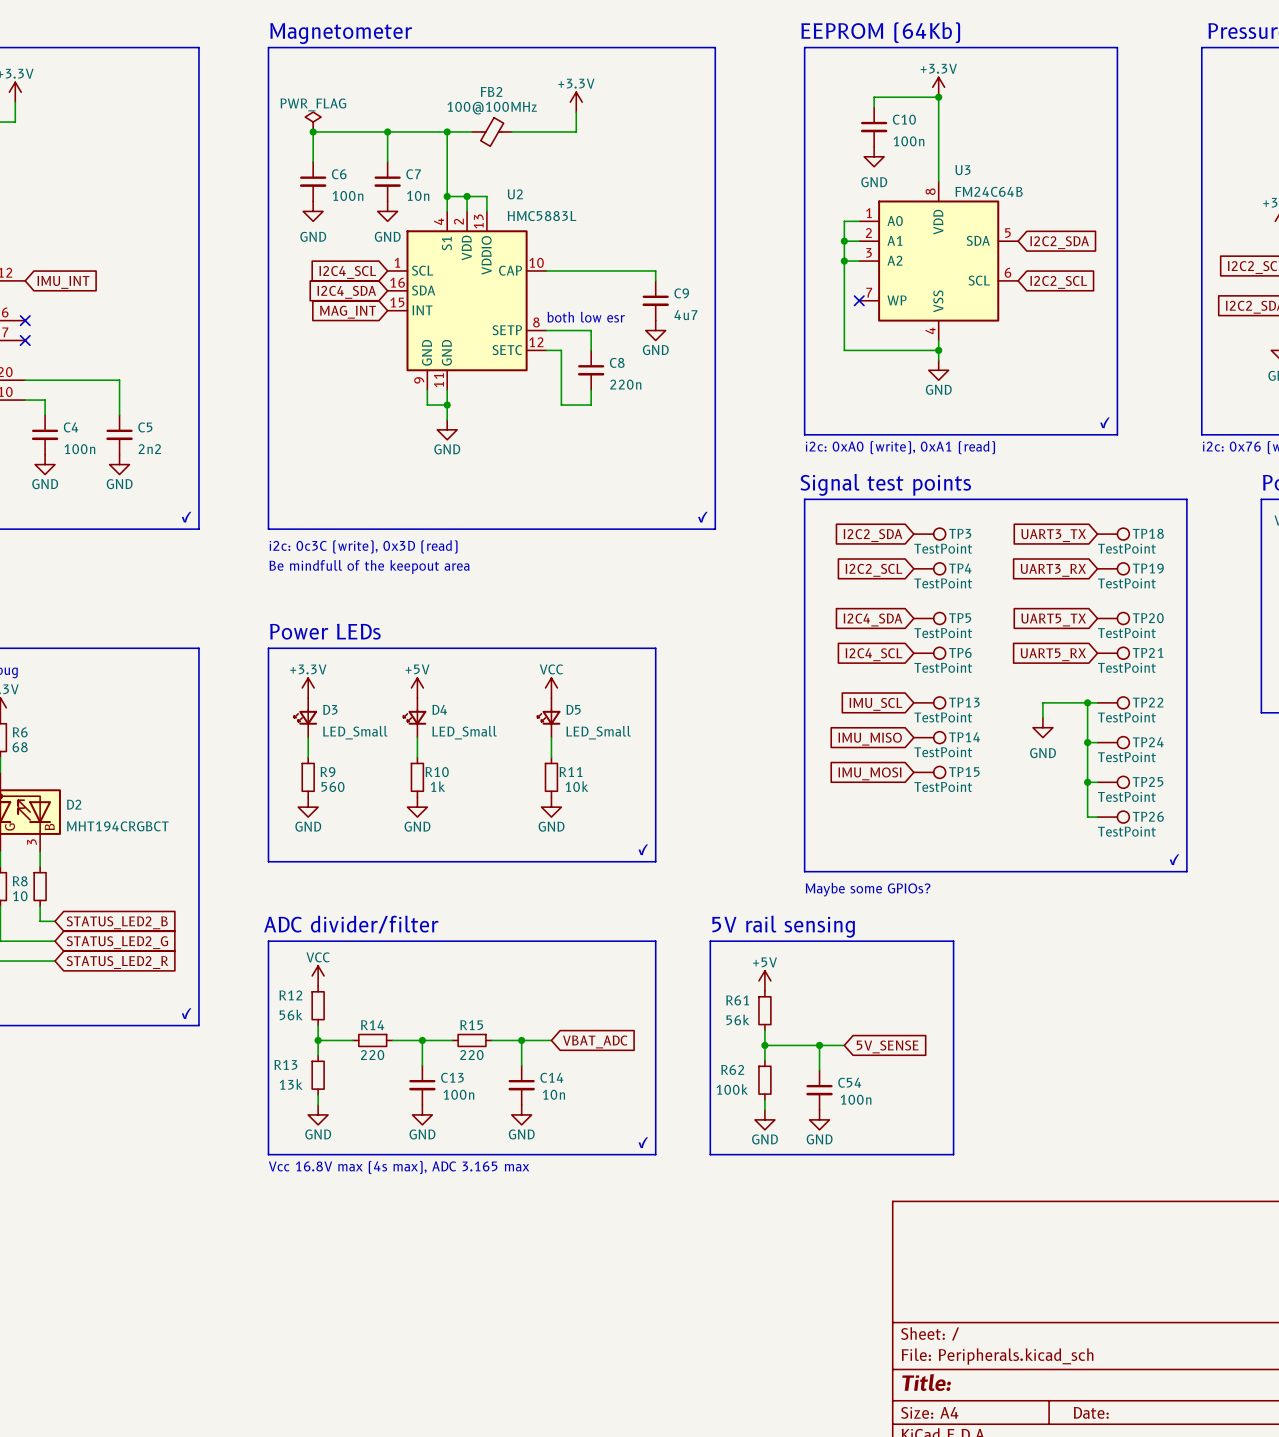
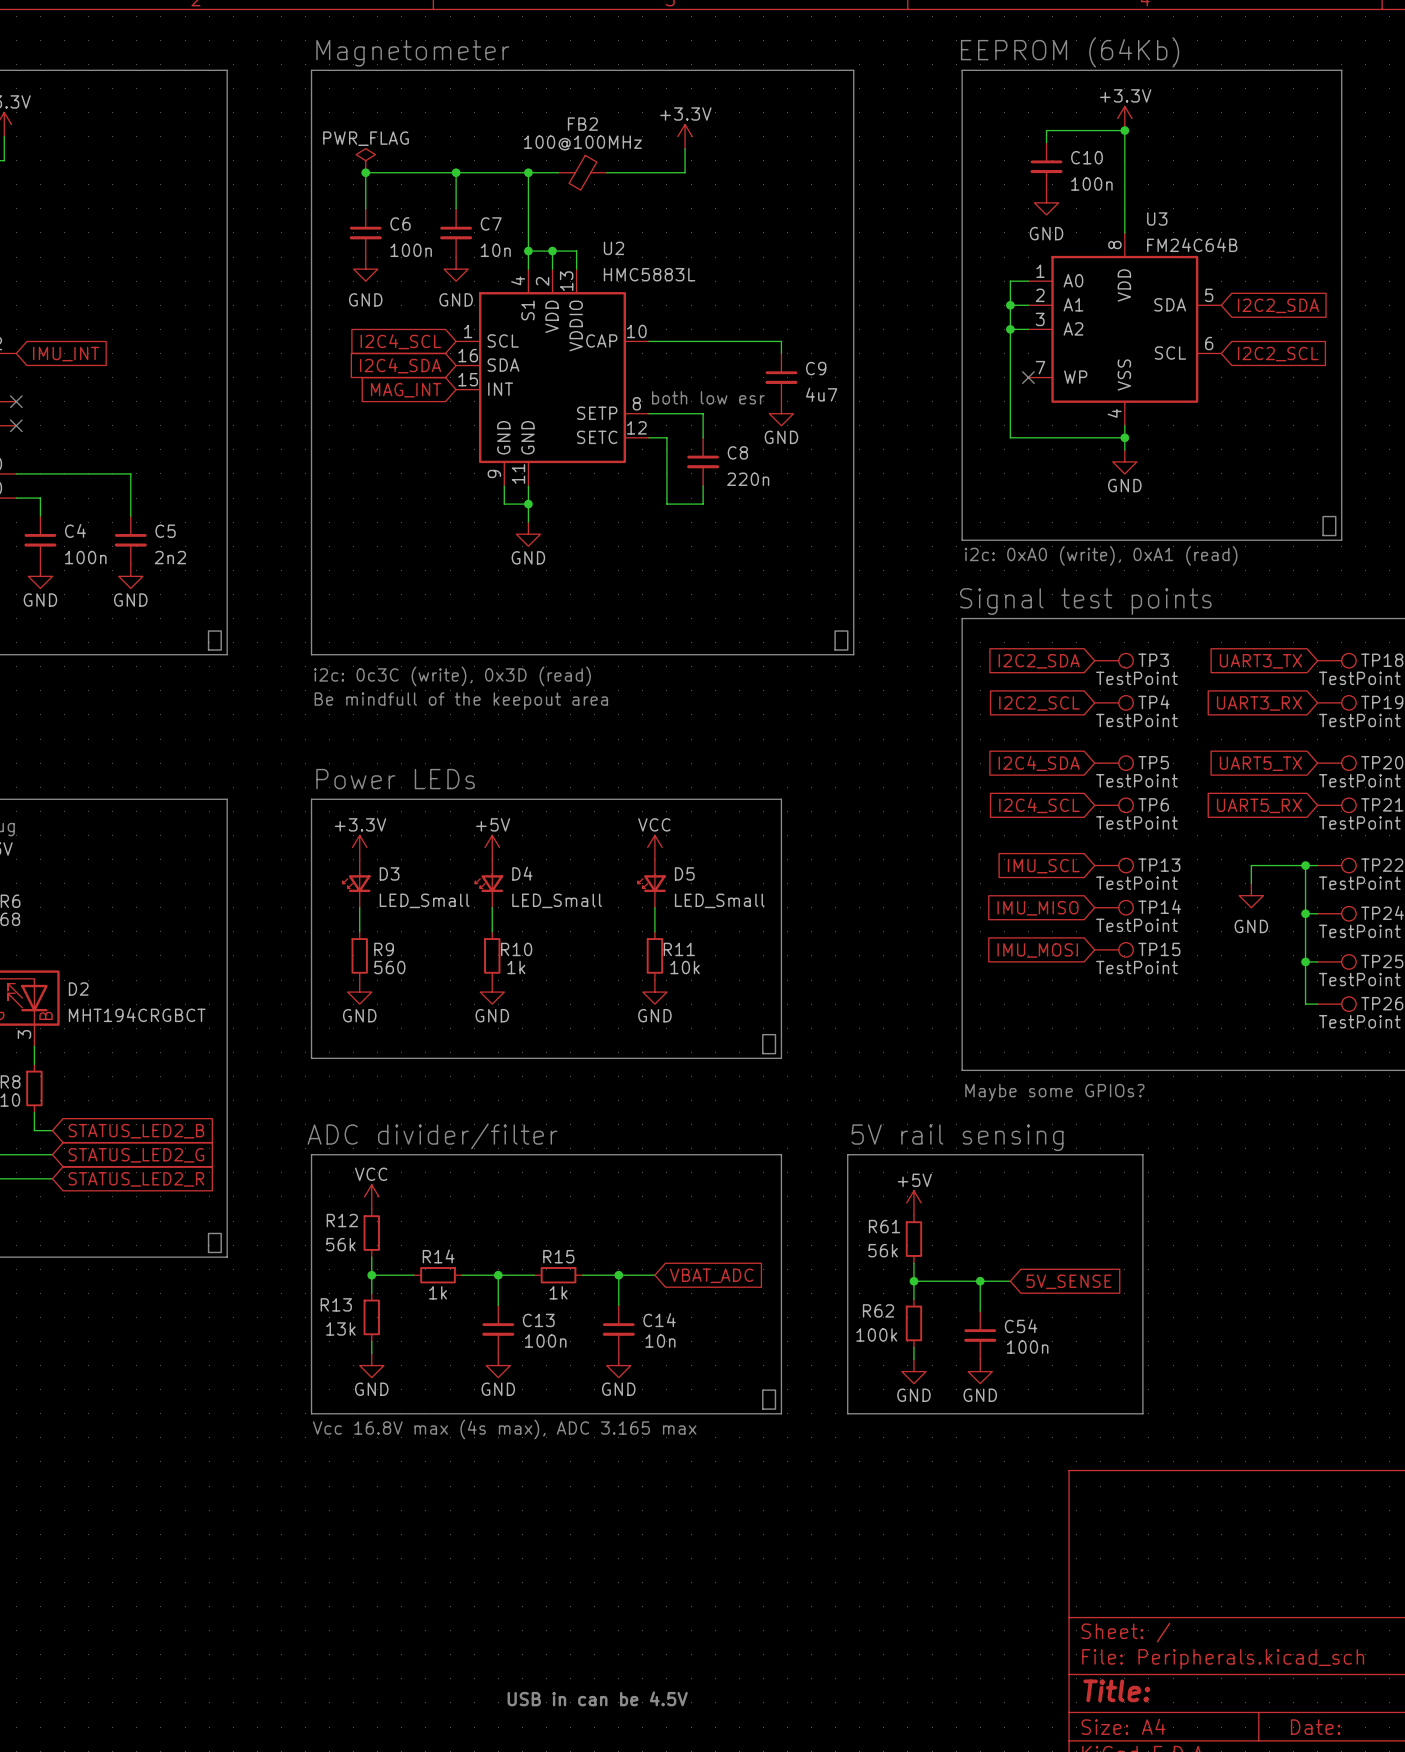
R14 value: 220 (372, 1055) -> 1k (438, 1292)
R15 value: 220 (471, 1055) -> 1k (558, 1292)
text: none -> USB in can be 4.5V (597, 1698)

